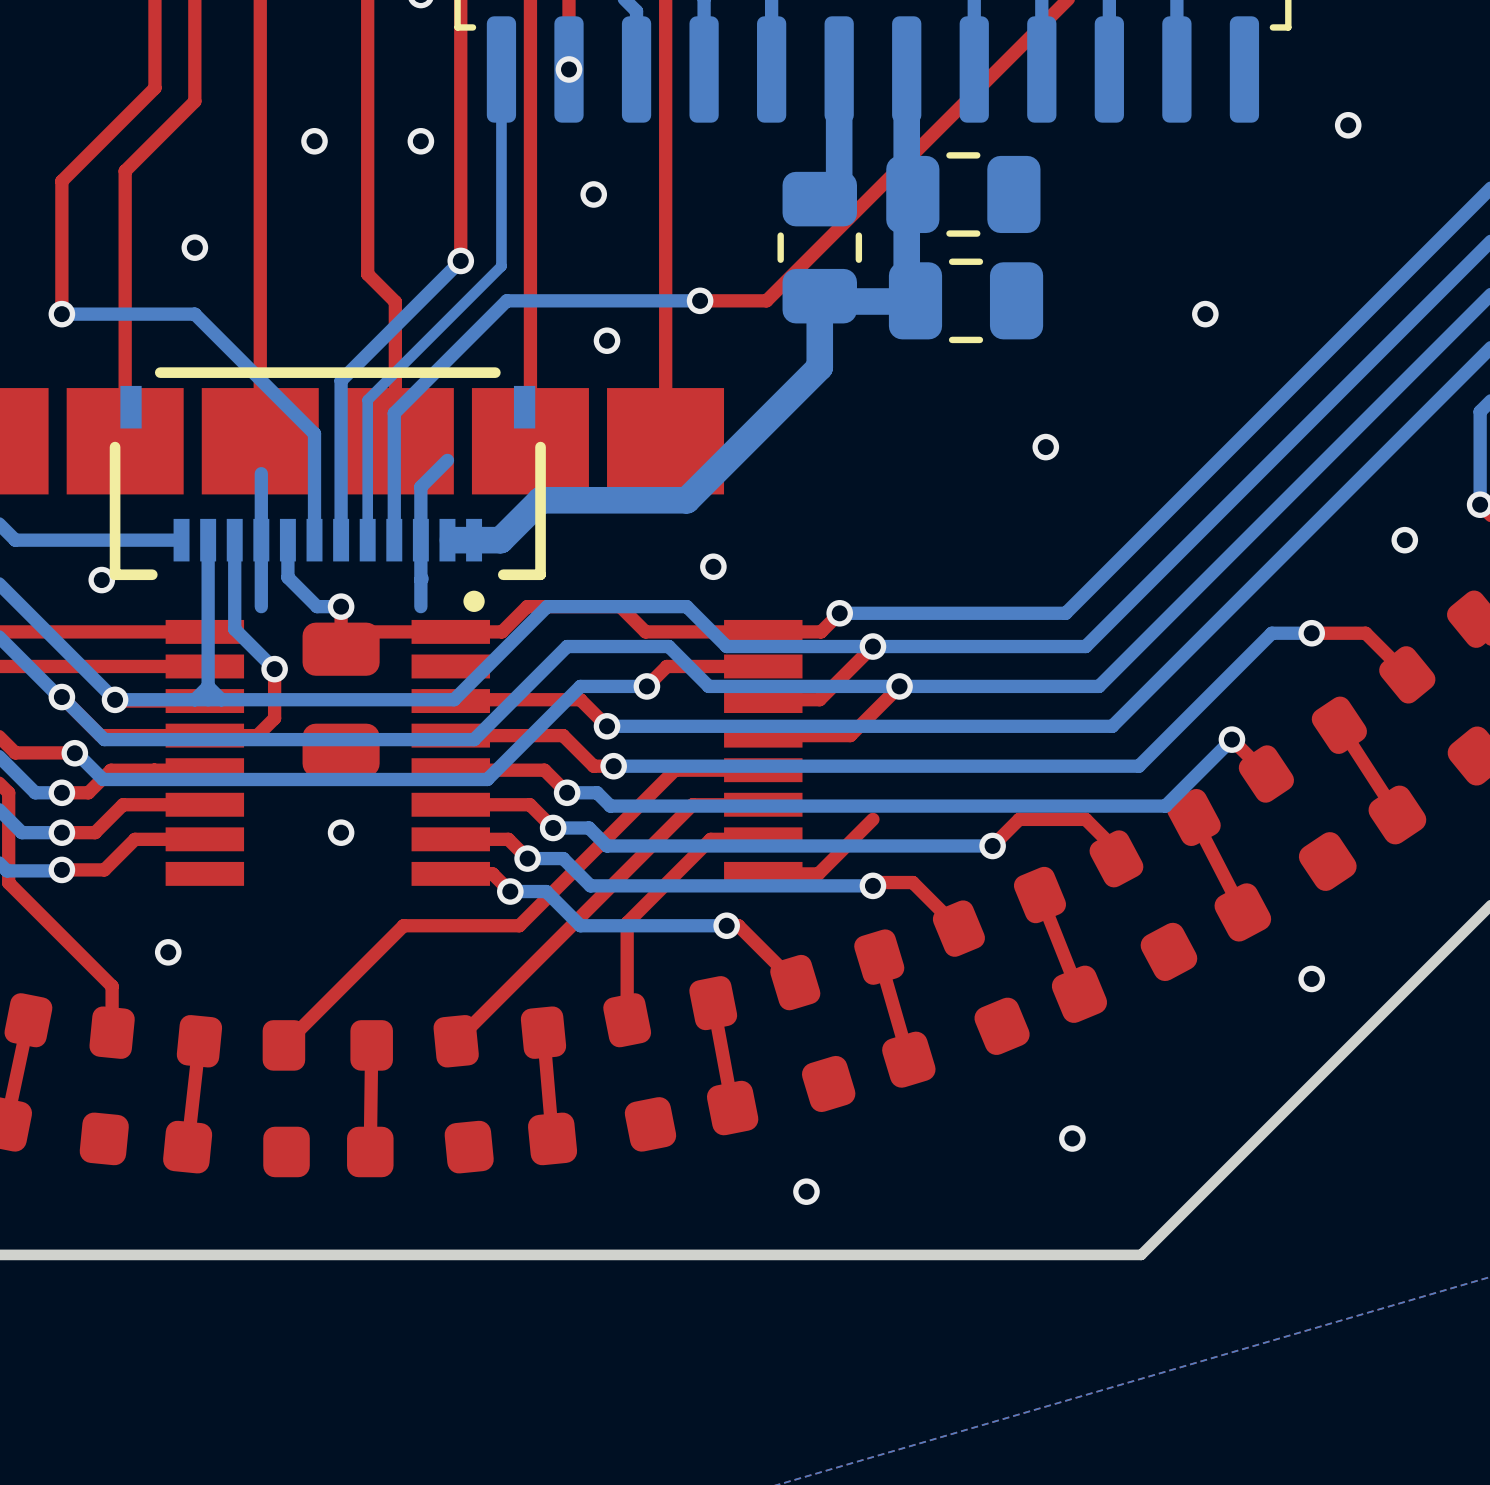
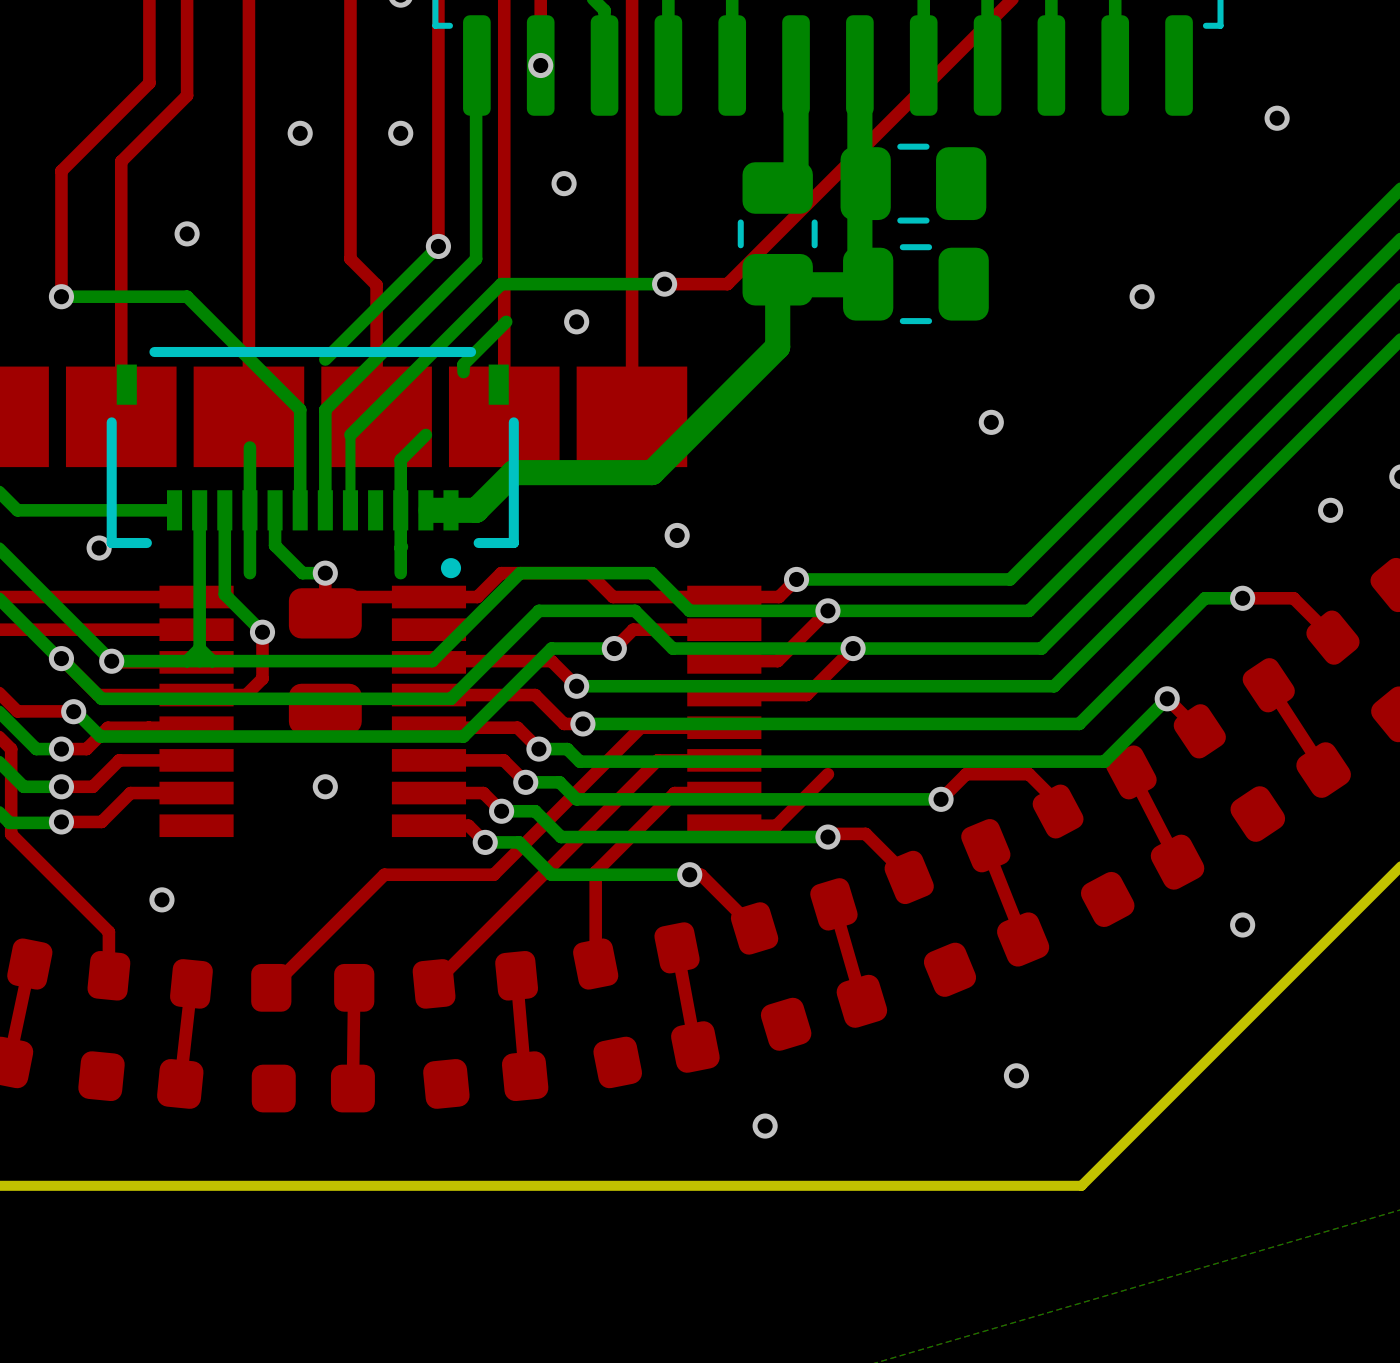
bottom track: (501, 69) (501, 266) (367, 400) (367, 460) -> (476, 65) (476, 259) (325, 409)
bottom track: (527, 300) (506, 300) (394, 413) (394, 540) -> (501, 284) (350, 434)
bottom track: none -> (506, 321) (463, 364) (463, 372)
bottom track: (341, 380) (341, 433) -> none

